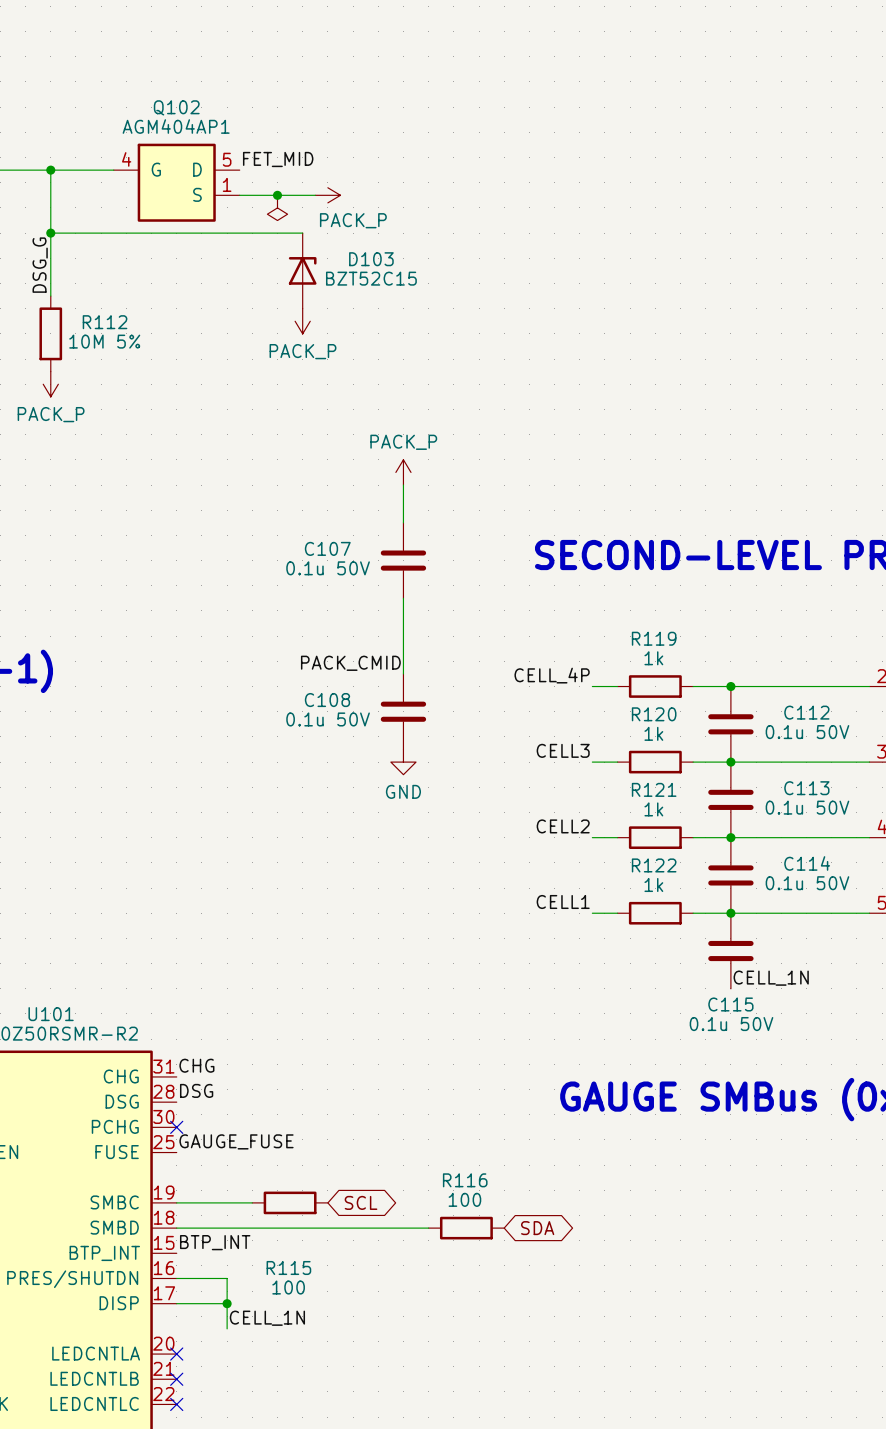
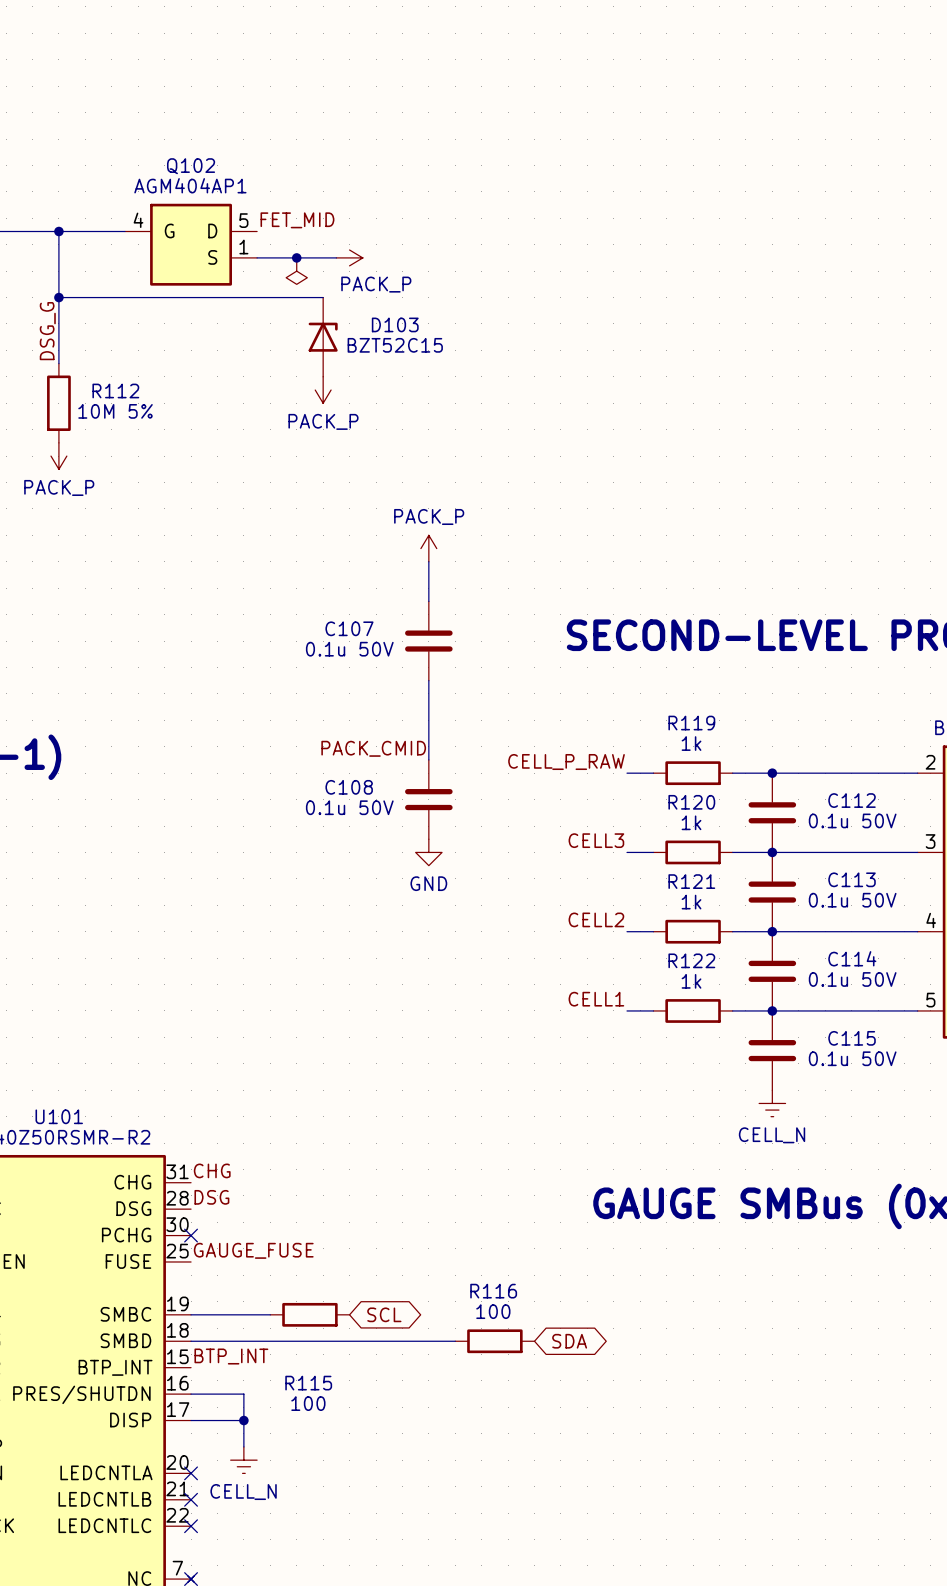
label: CELL_4P (552, 675) -> CELL_P_RAW (566, 762)
label: CELL_1N (771, 978) -> none
power symbol: none -> CELL_N (772, 1103)
C115 name position: C115 (730, 1004) -> C115 (852, 1038)
C115 value position: 0.1u 50V (731, 1024) -> 0.1u 50V (852, 1058)
label: CELL_1N (267, 1318) -> none
power symbol: none -> CELL_N (243, 1460)

